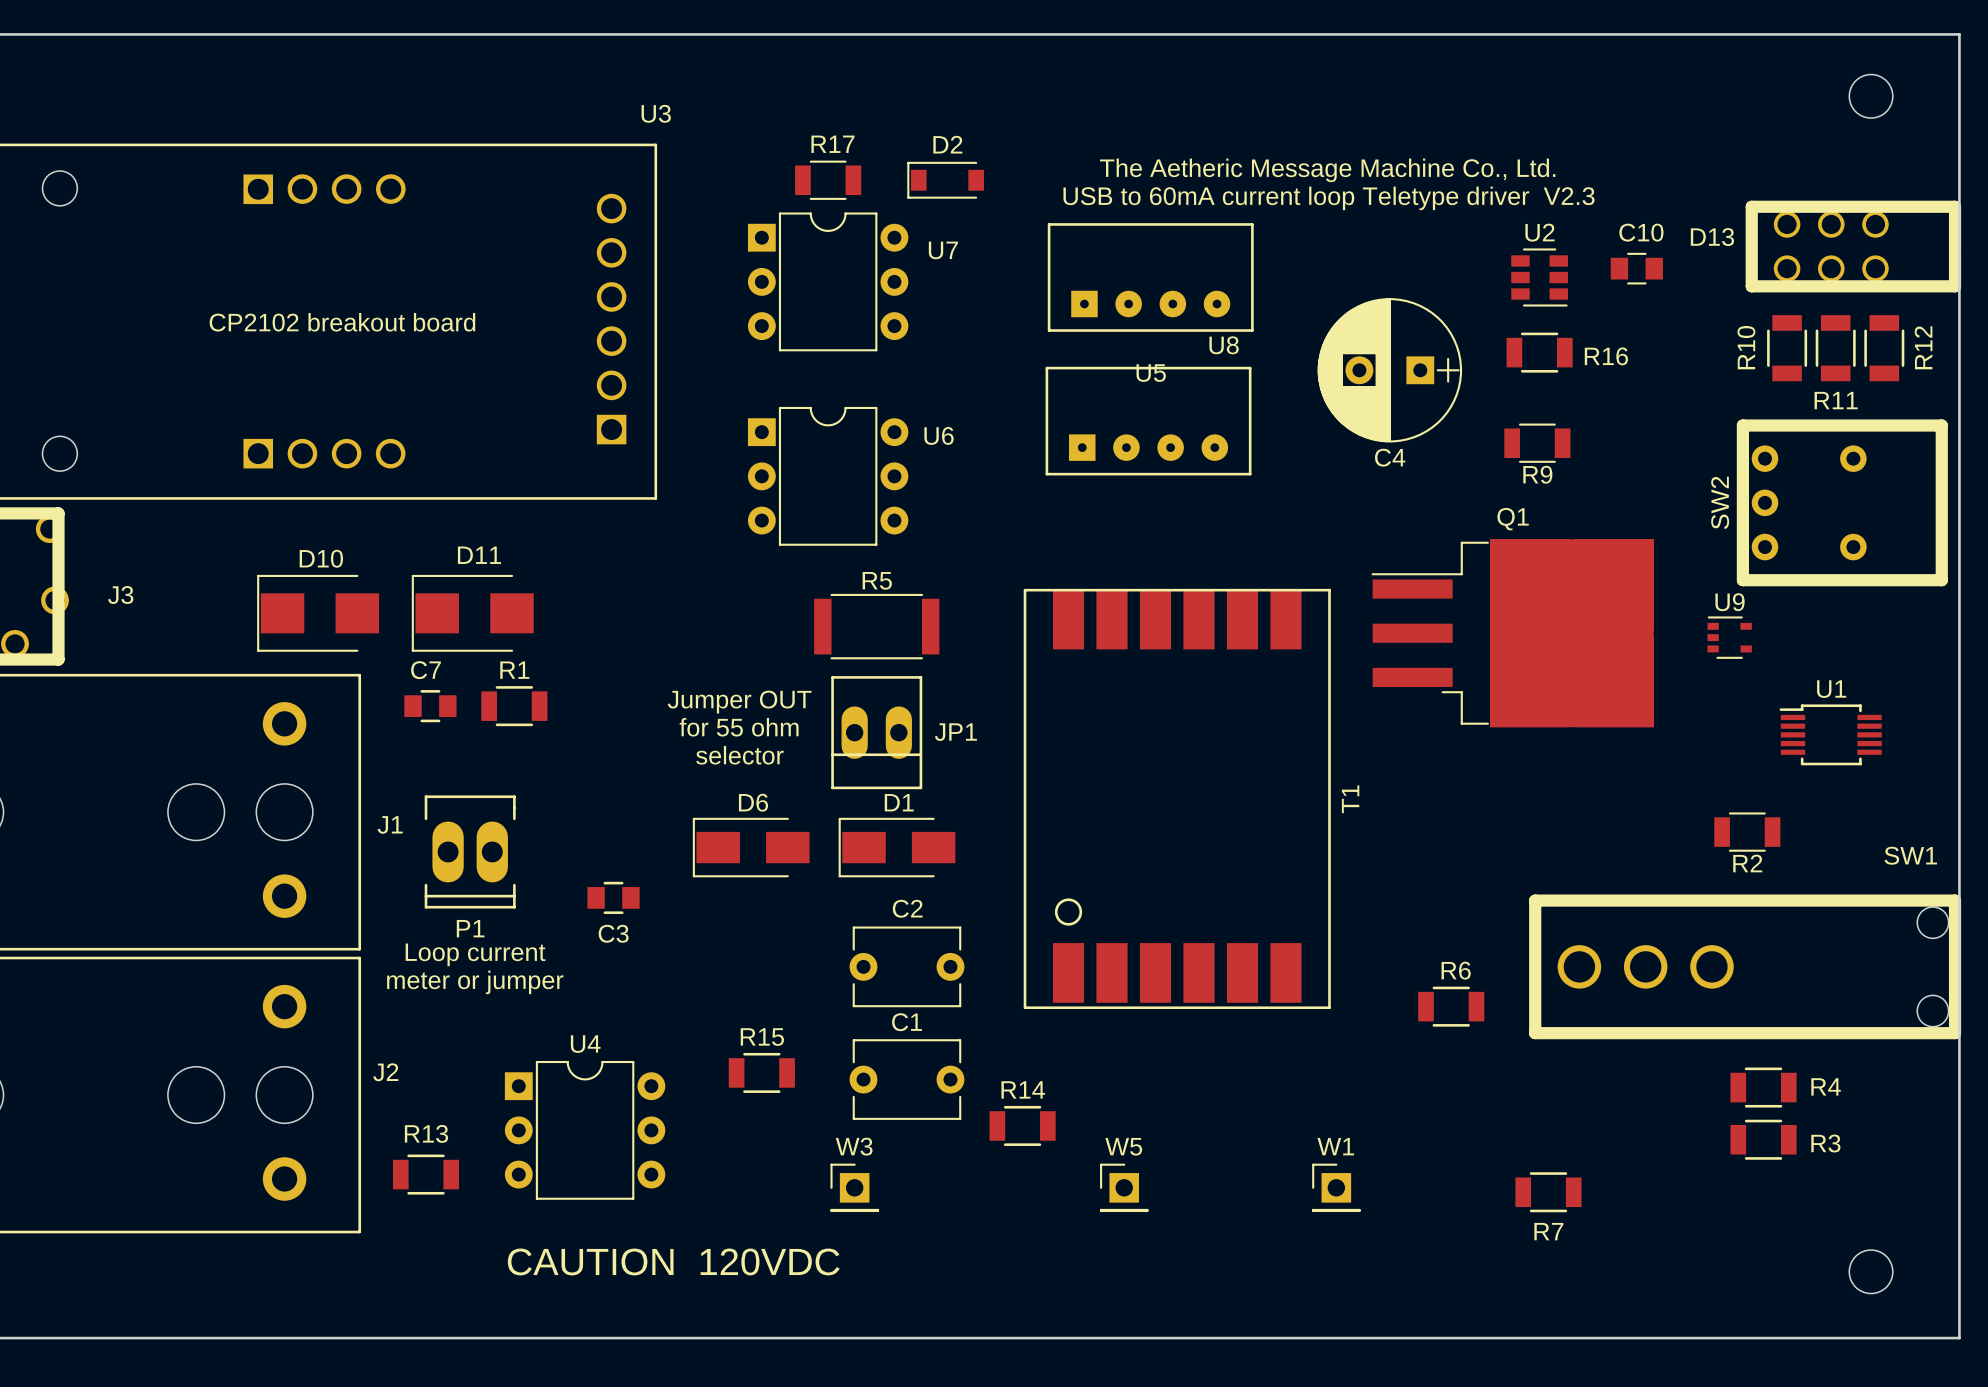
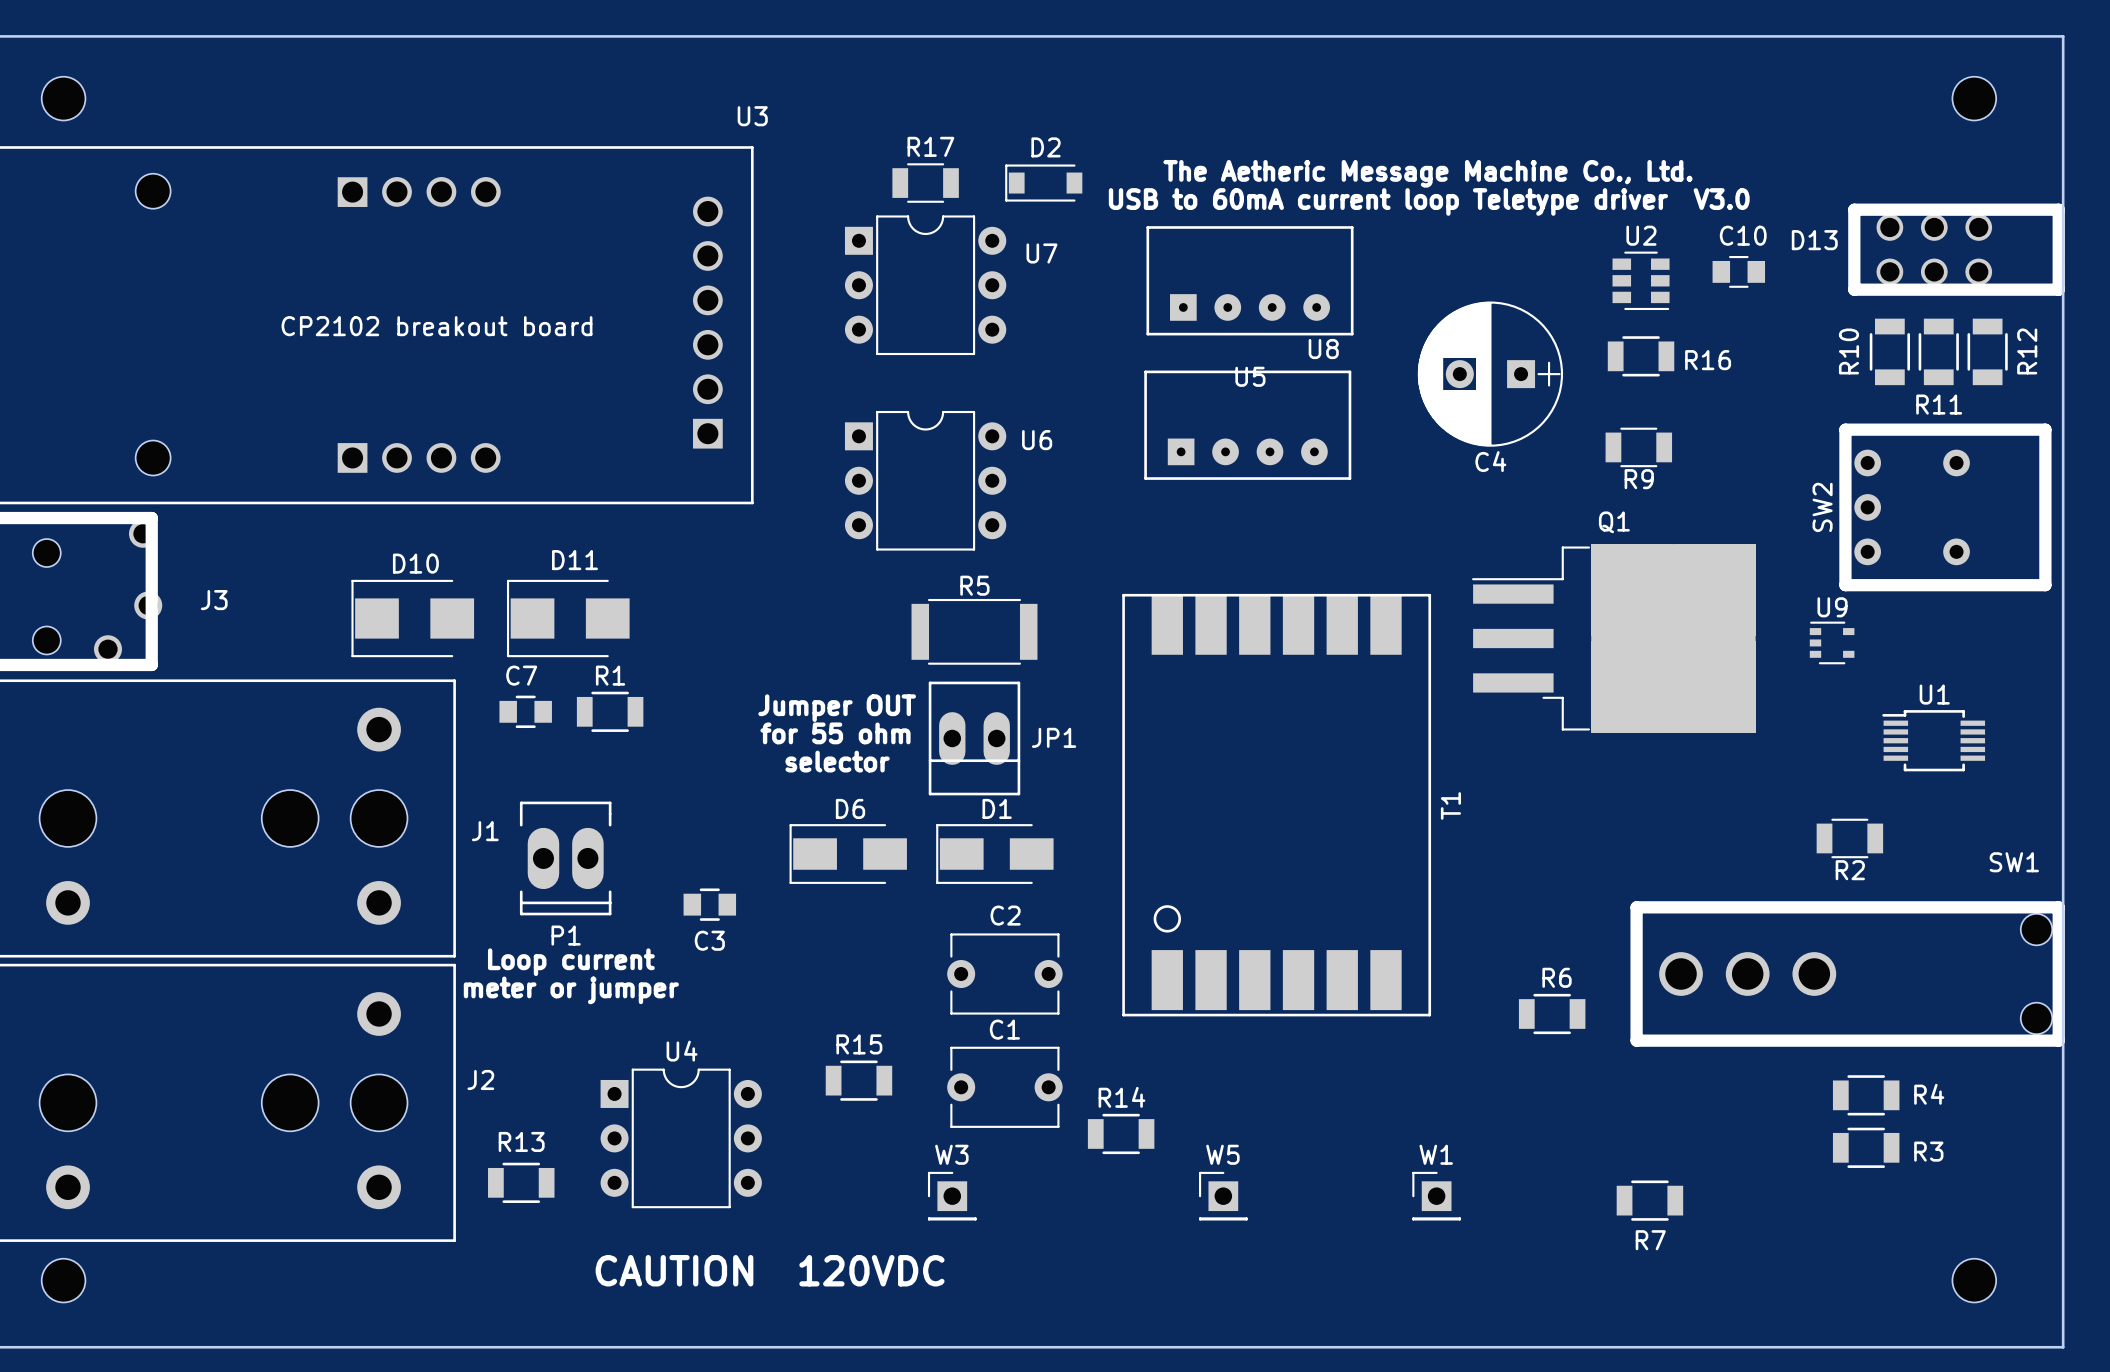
text: USB to 60mA current loop Teletype driver V2.3 (1329, 198) -> USB to 60mA current loop Teletype driver V3.0 (1429, 201)

